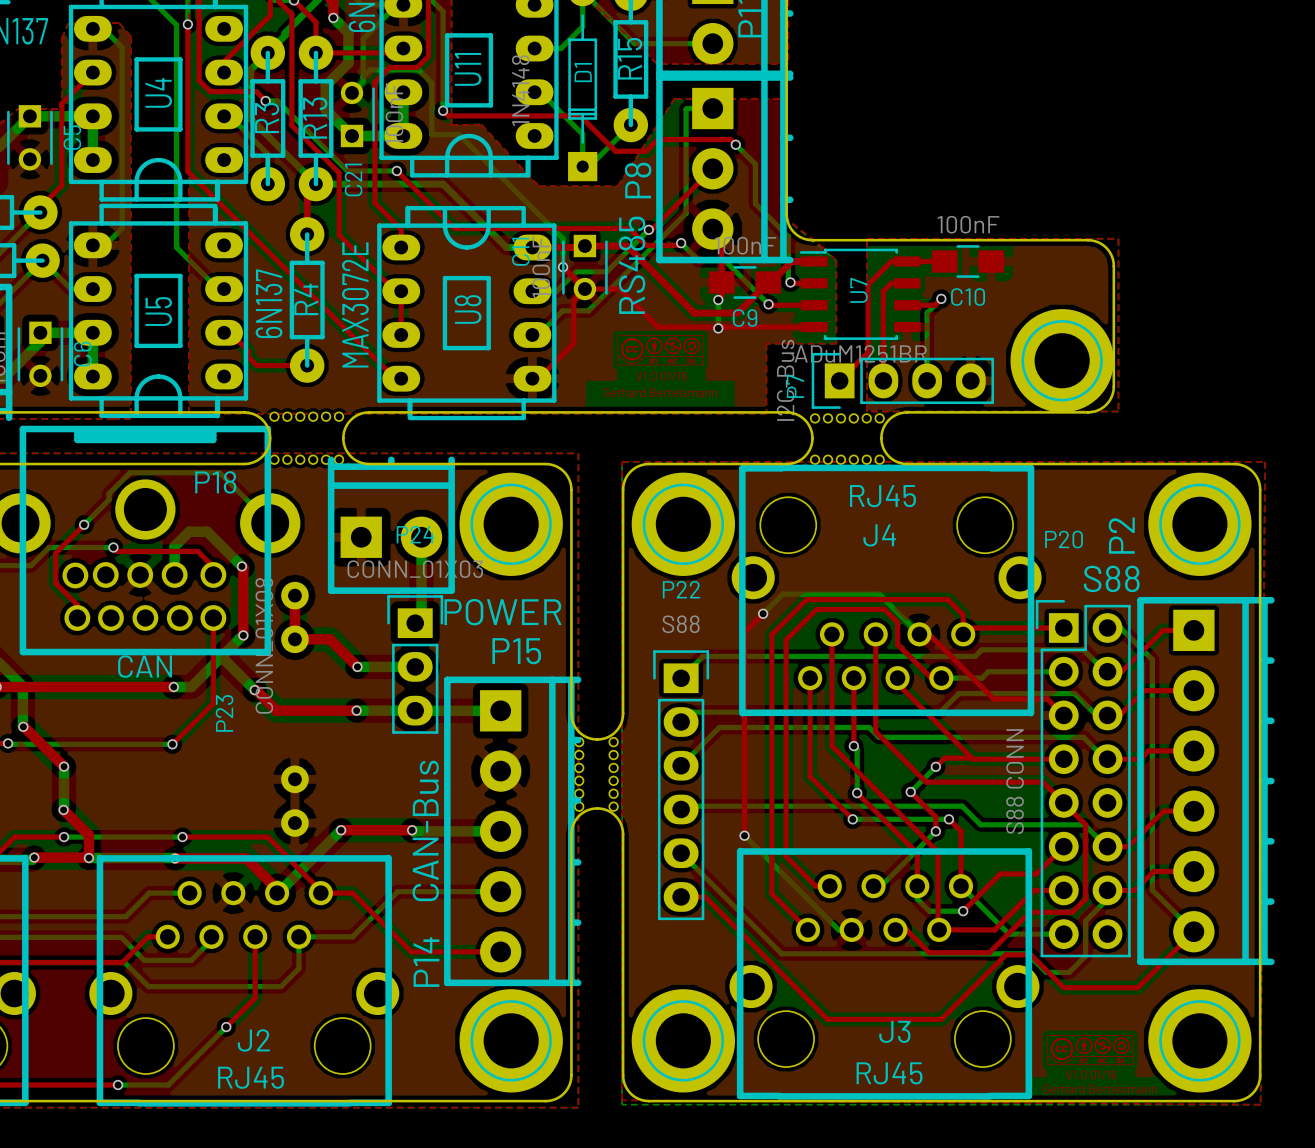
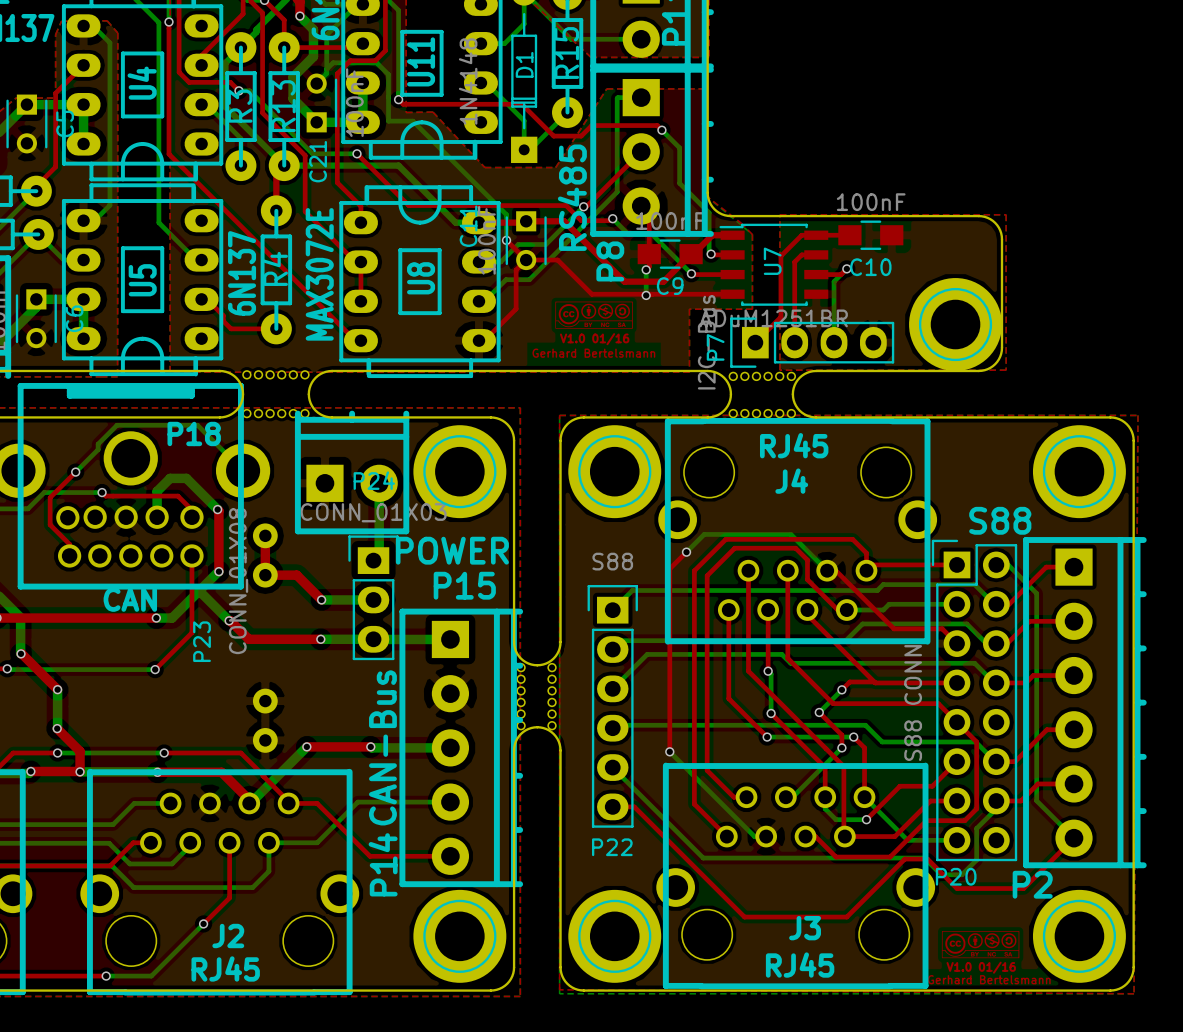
P8 name position: P8 (638, 180) -> P8 (610, 261)
P8 value position: RS485 (632, 265) -> RS485 (572, 197)
P2 name rotation: 0° (1121, 535) -> 90° clockwise (1032, 884)
P2 name position: P2 (1121, 535) -> P2 (1032, 884)
P20 name position: P20 (1064, 539) -> P20 (956, 876)
P22 name position: P22 (681, 589) -> P22 (612, 847)

